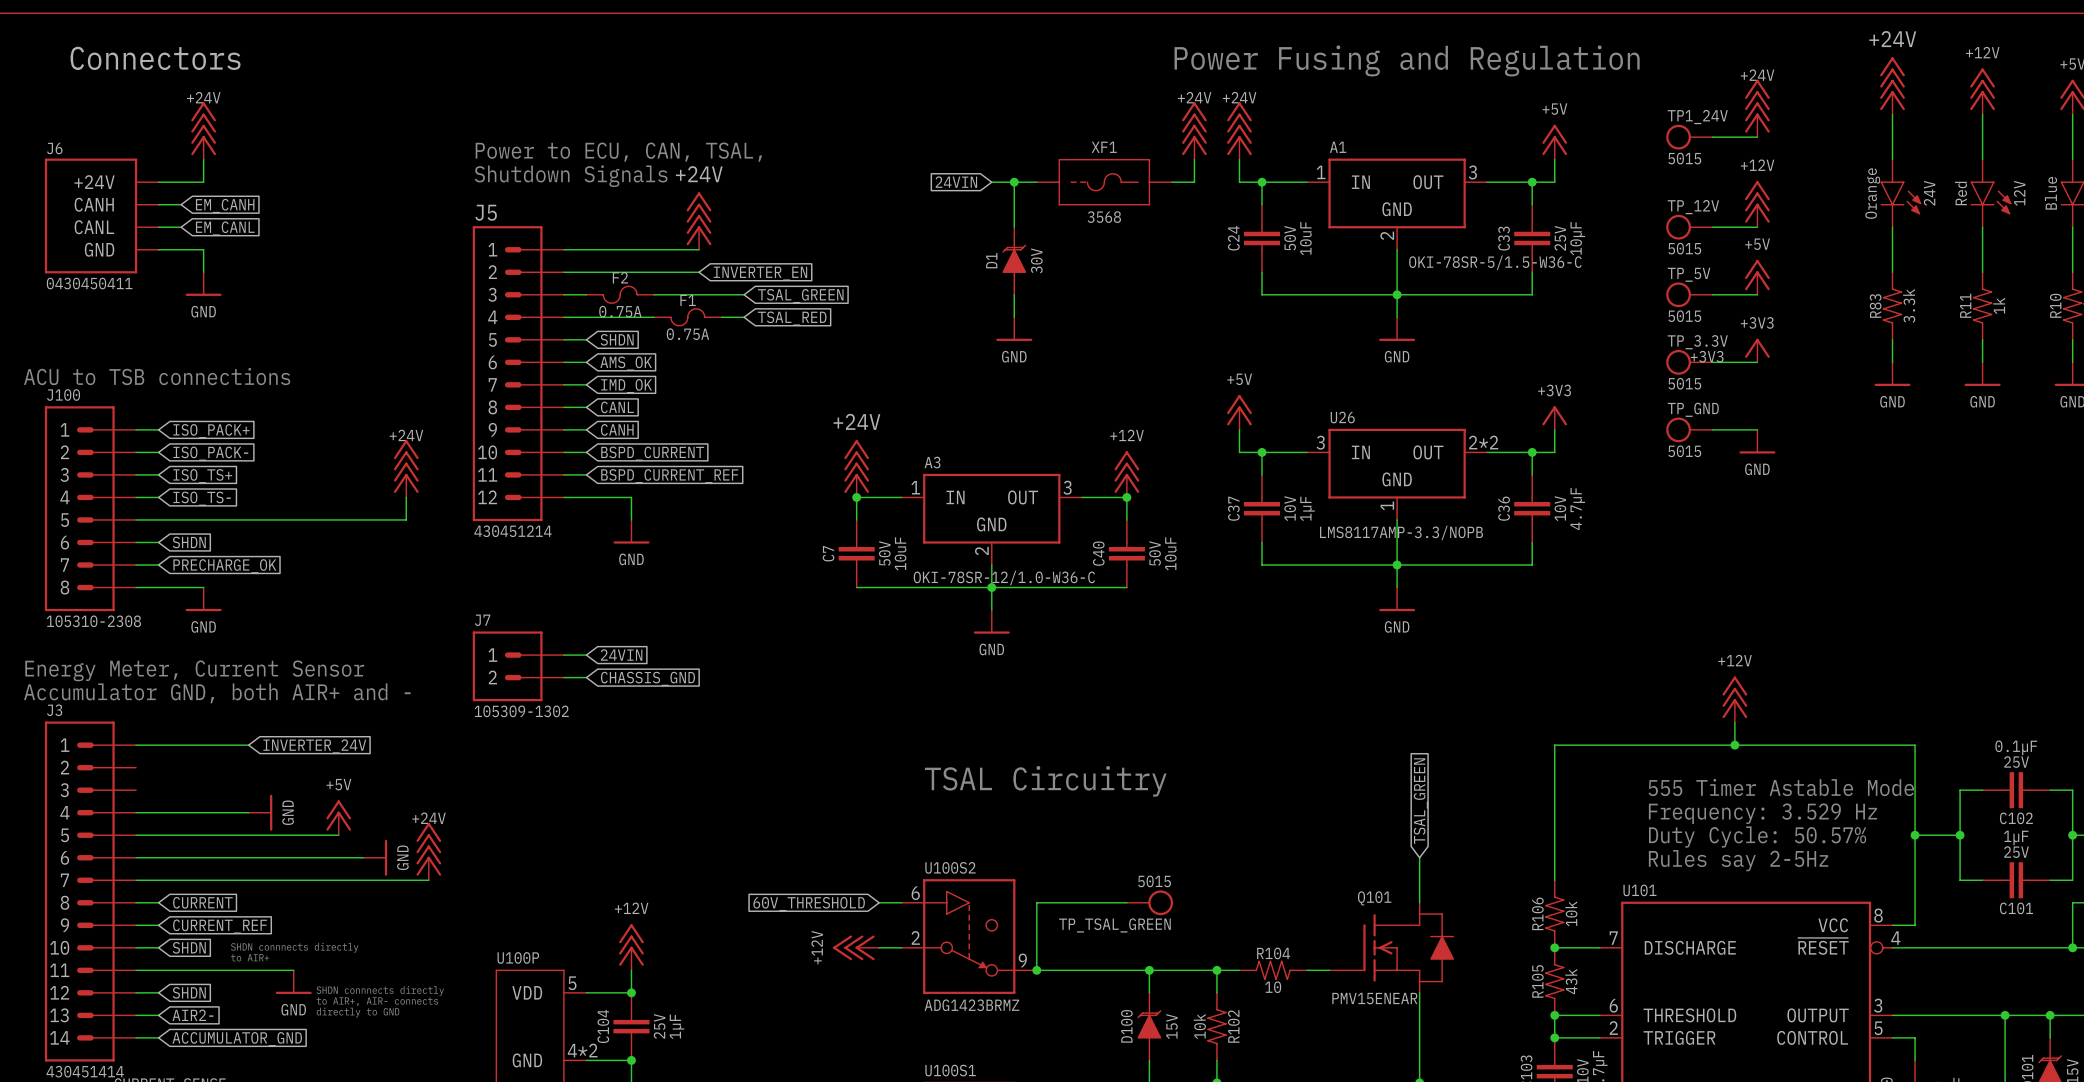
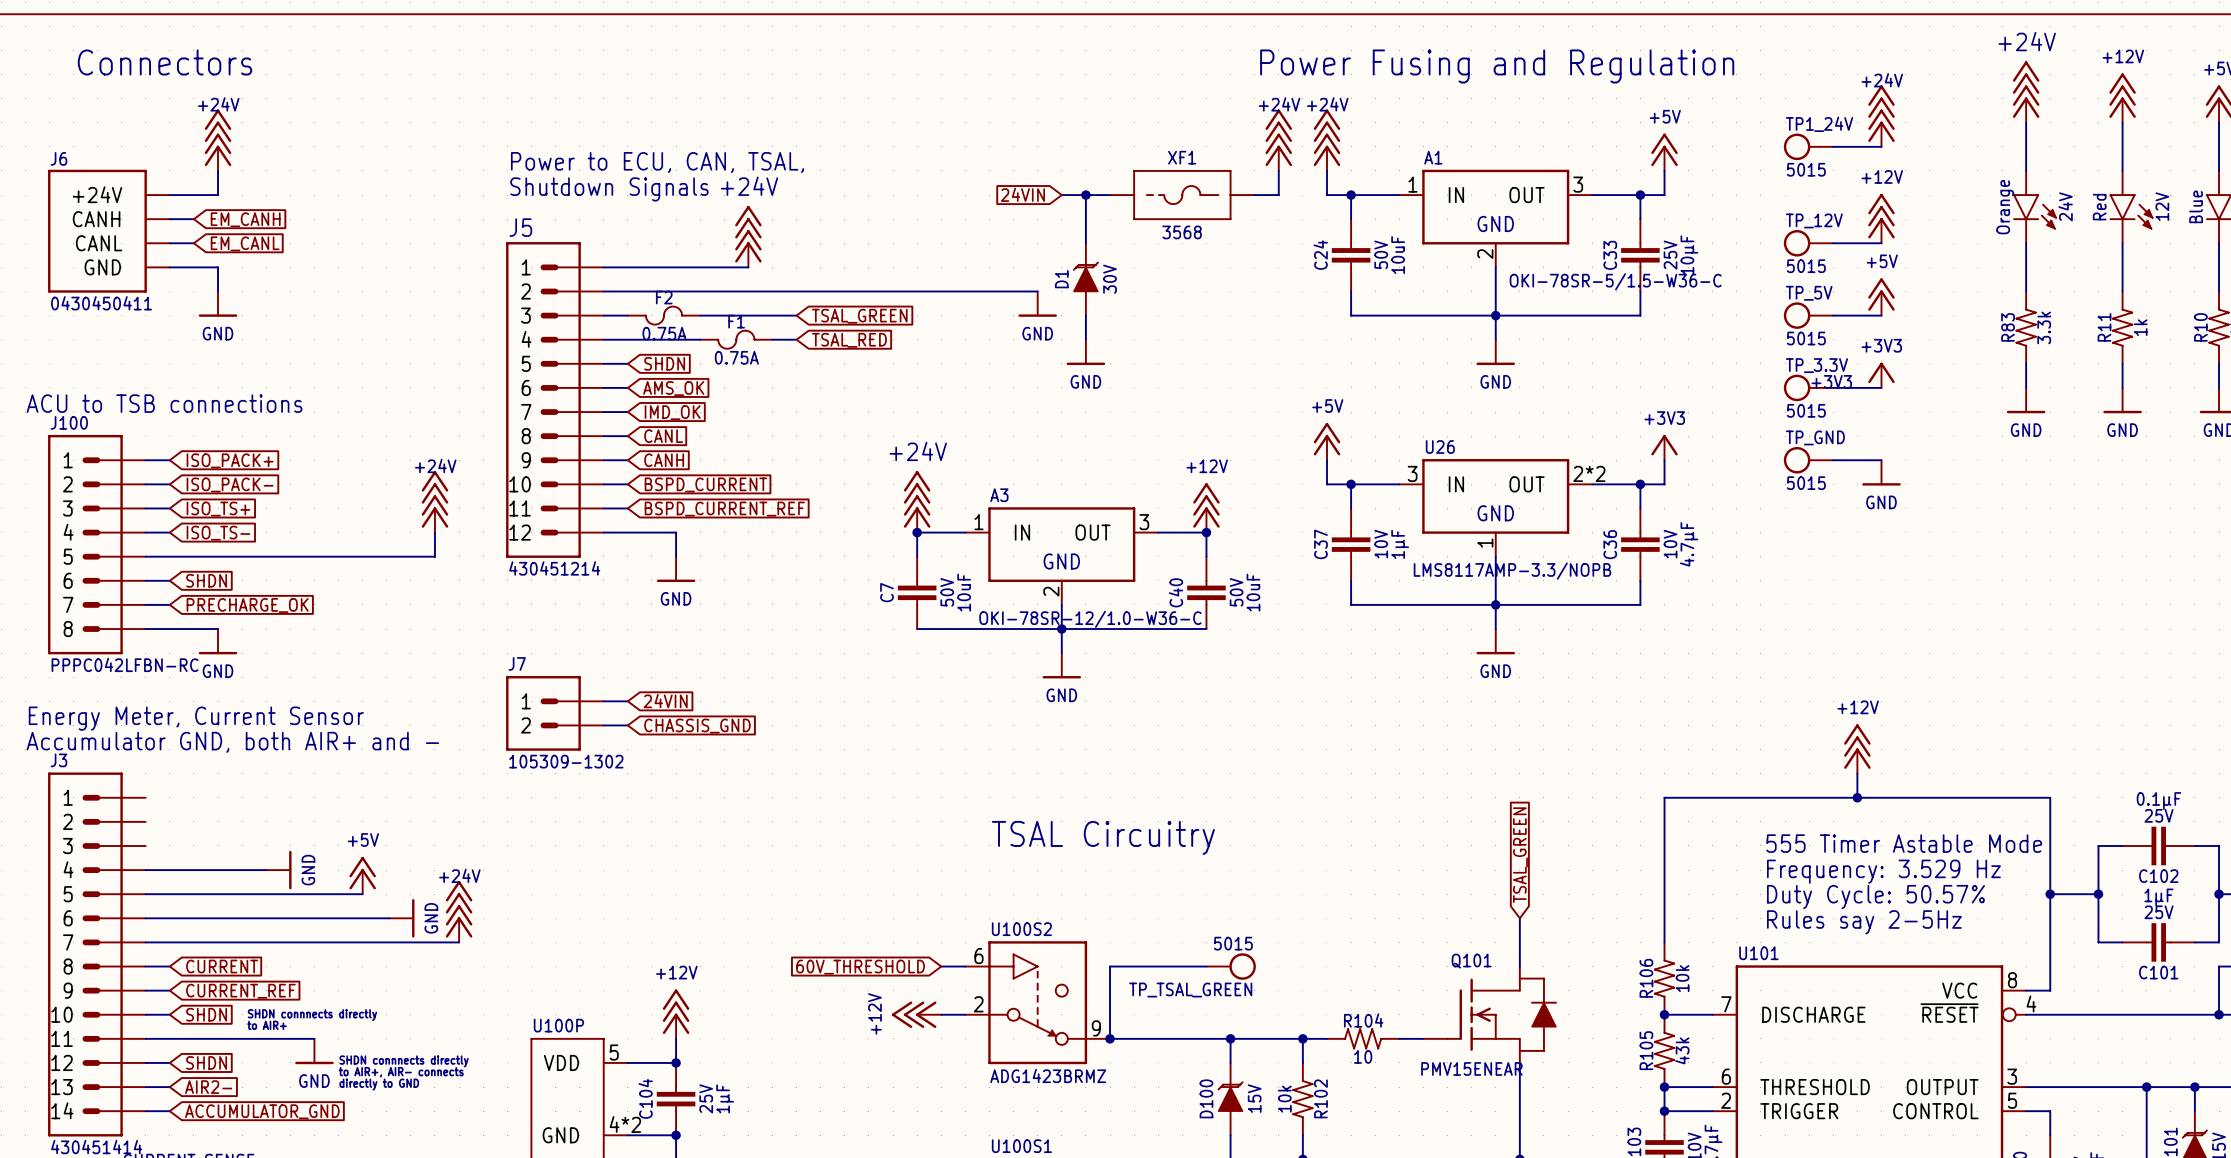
wire: none -> (748, 291) (1037, 291)
global label: INVERTER_EN (760, 273) -> none
power symbol: none -> GND (1037, 304)
J100 text: 105310-2308 (93, 621) -> PPPC042LFBN-RC (125, 664)
wire: (136, 745) (248, 745) -> none
global label: INVERTER_24V (314, 746) -> none

